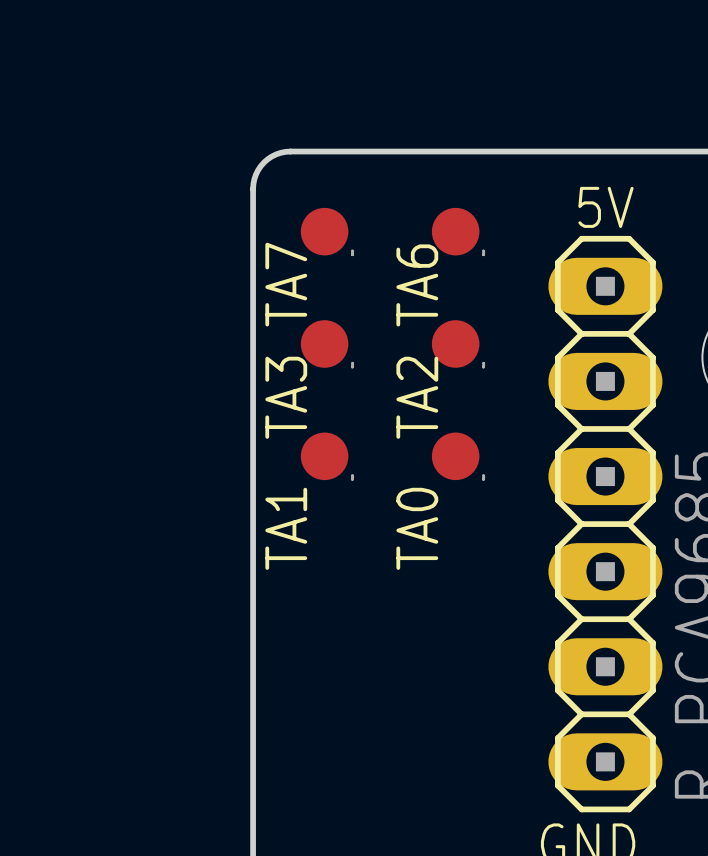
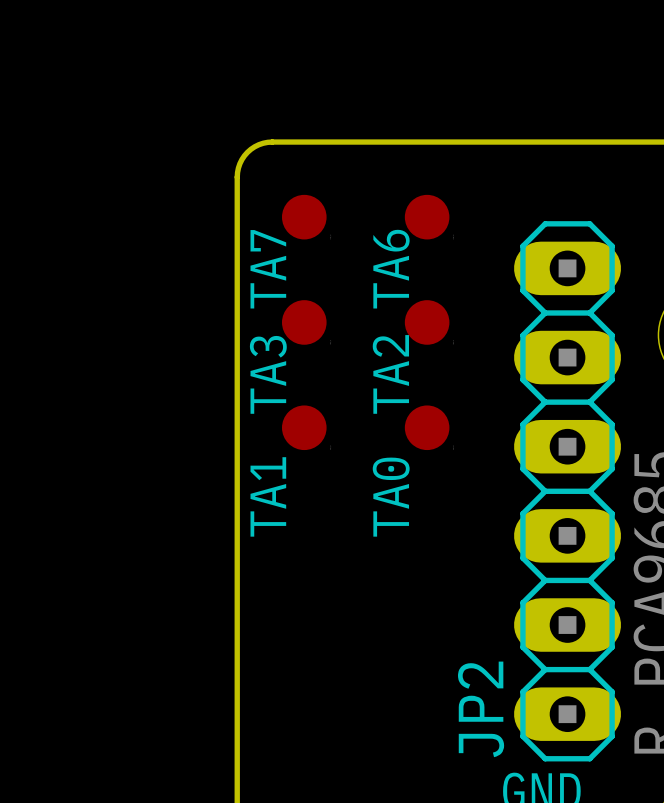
text: 5V (605, 207) -> none
JP2 name: none -> JP2 (481, 709)

